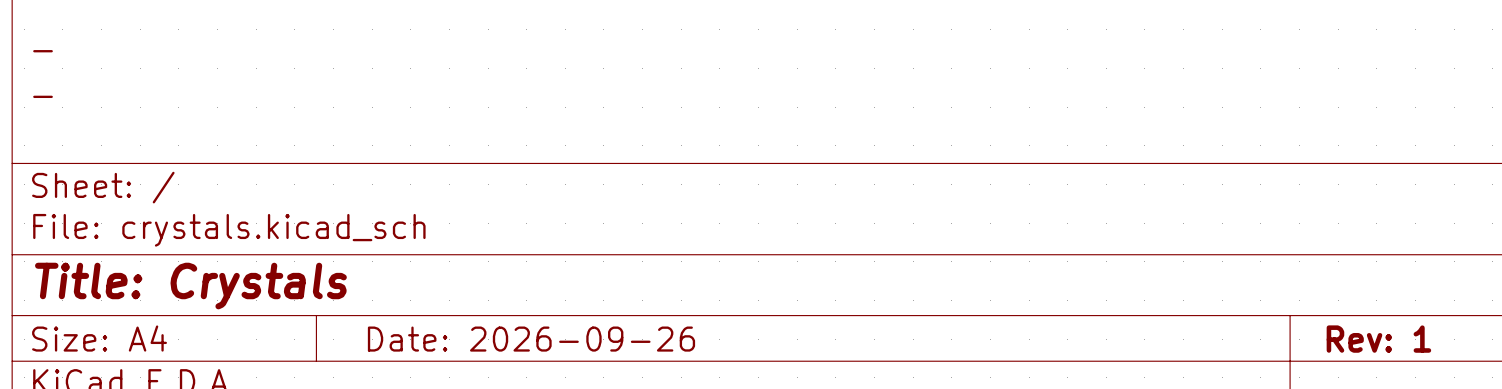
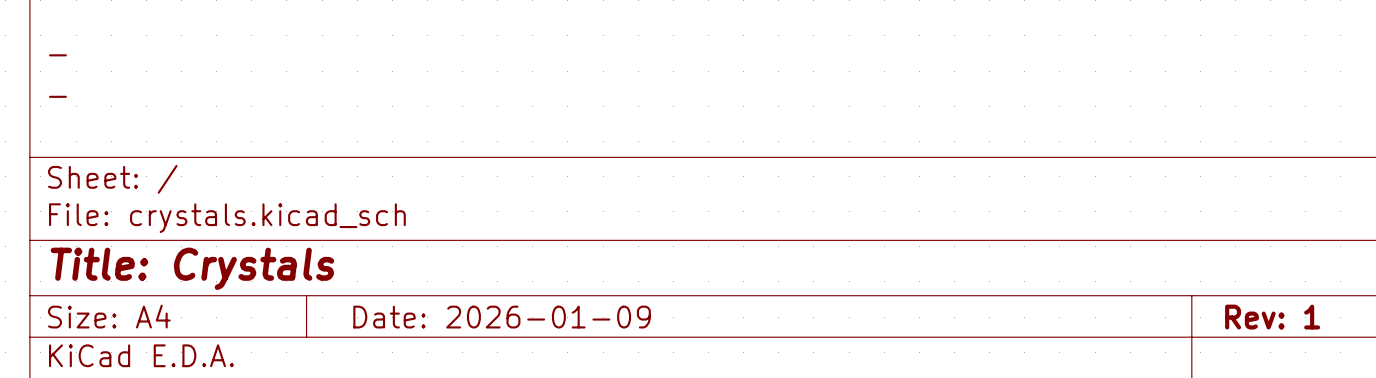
title block: Date: 2026-09-26 (531, 339) -> Date: 2026-01-09 (502, 317)

